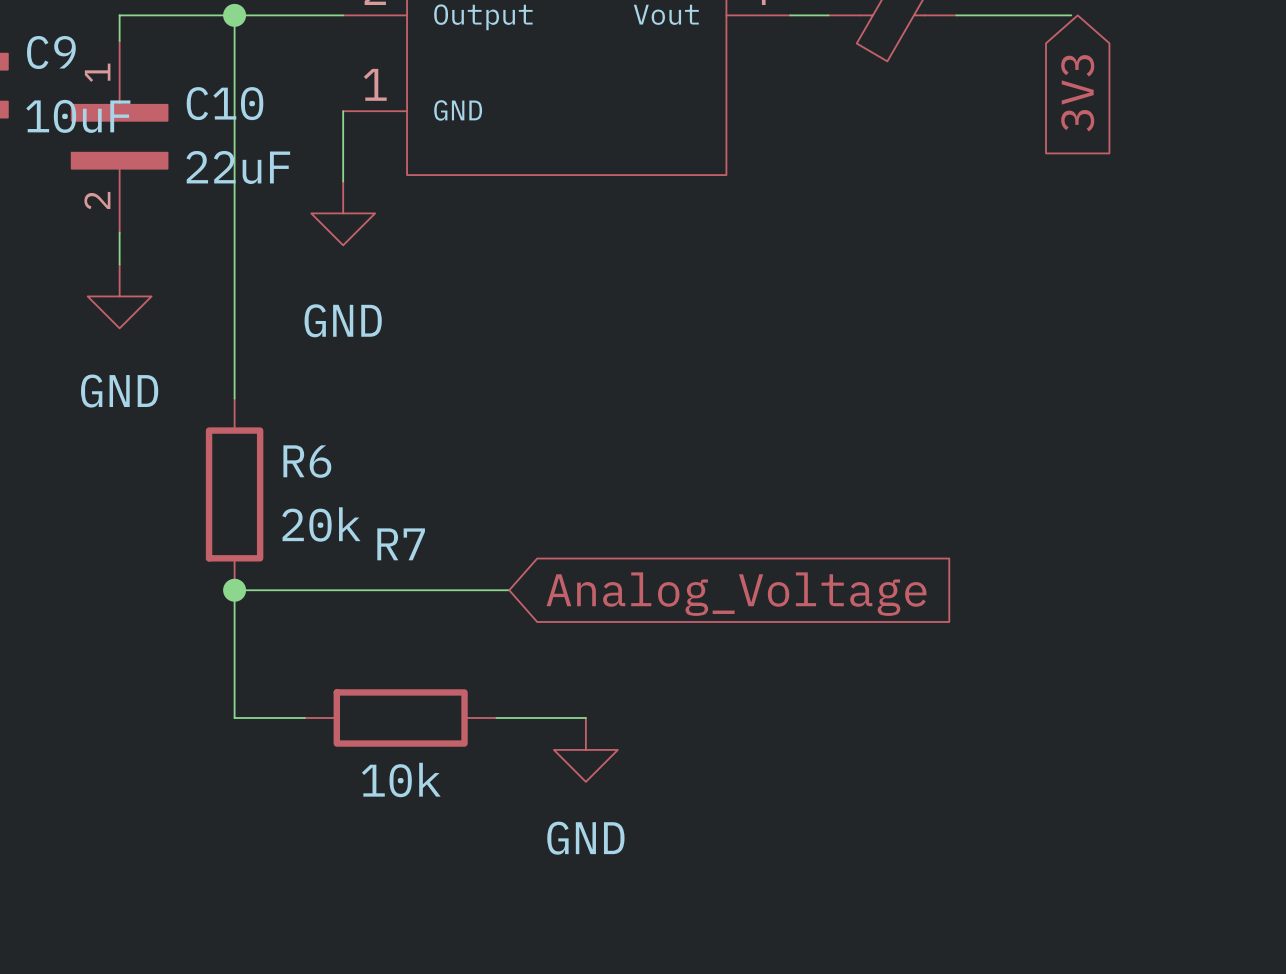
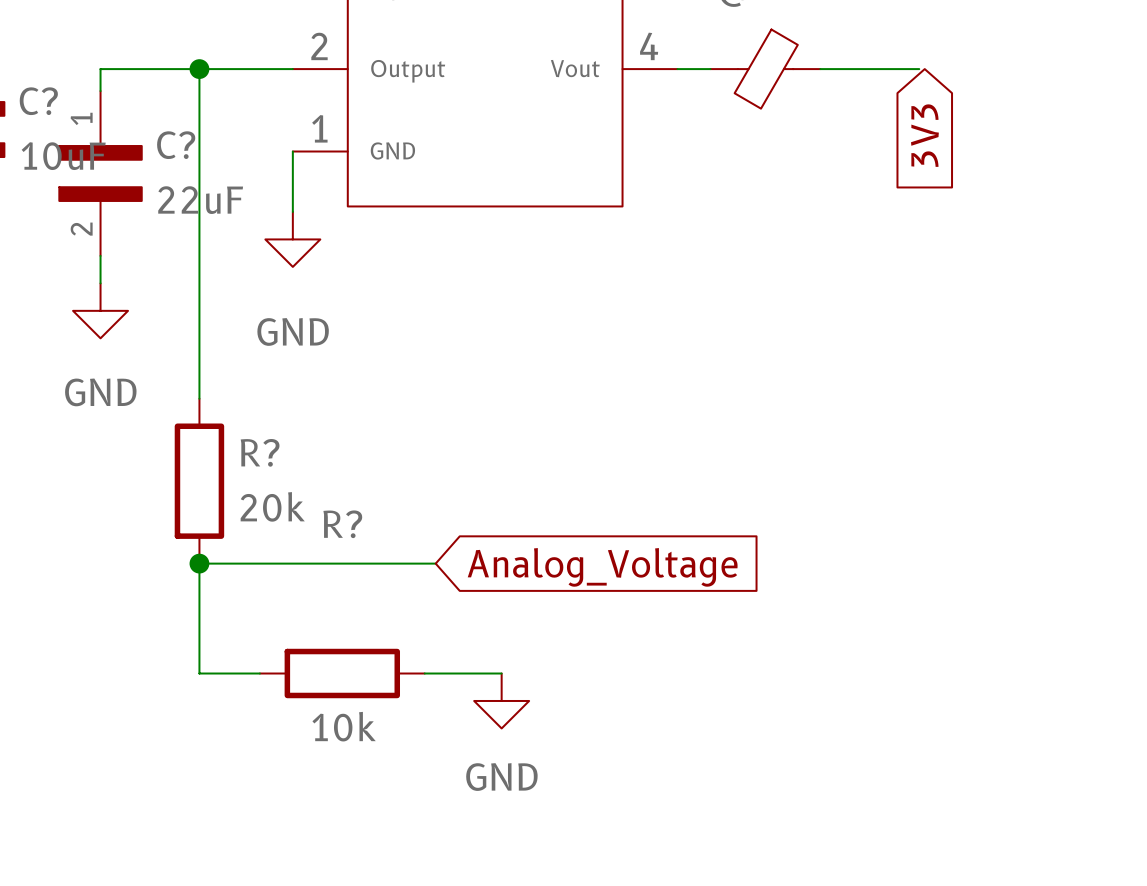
C9 name: C9 (51, 52) -> C? (38, 101)
C10 name: C10 (224, 103) -> C? (176, 145)
R6 name: R6 (307, 461) -> R? (260, 452)
R7 name: R7 (401, 544) -> R? (342, 524)

